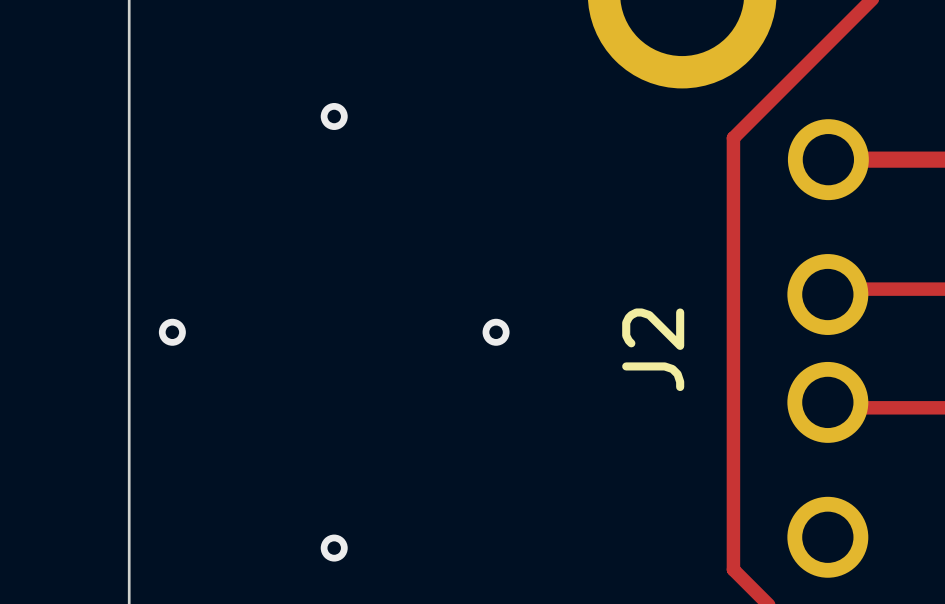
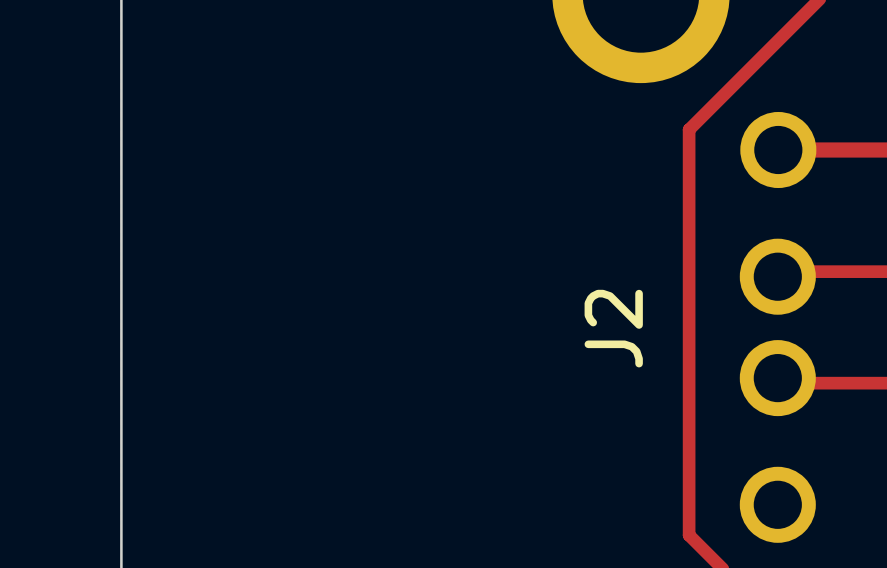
via: (334, 116) -> none
via: (172, 332) -> none
via: (496, 332) -> none
via: (334, 548) -> none

